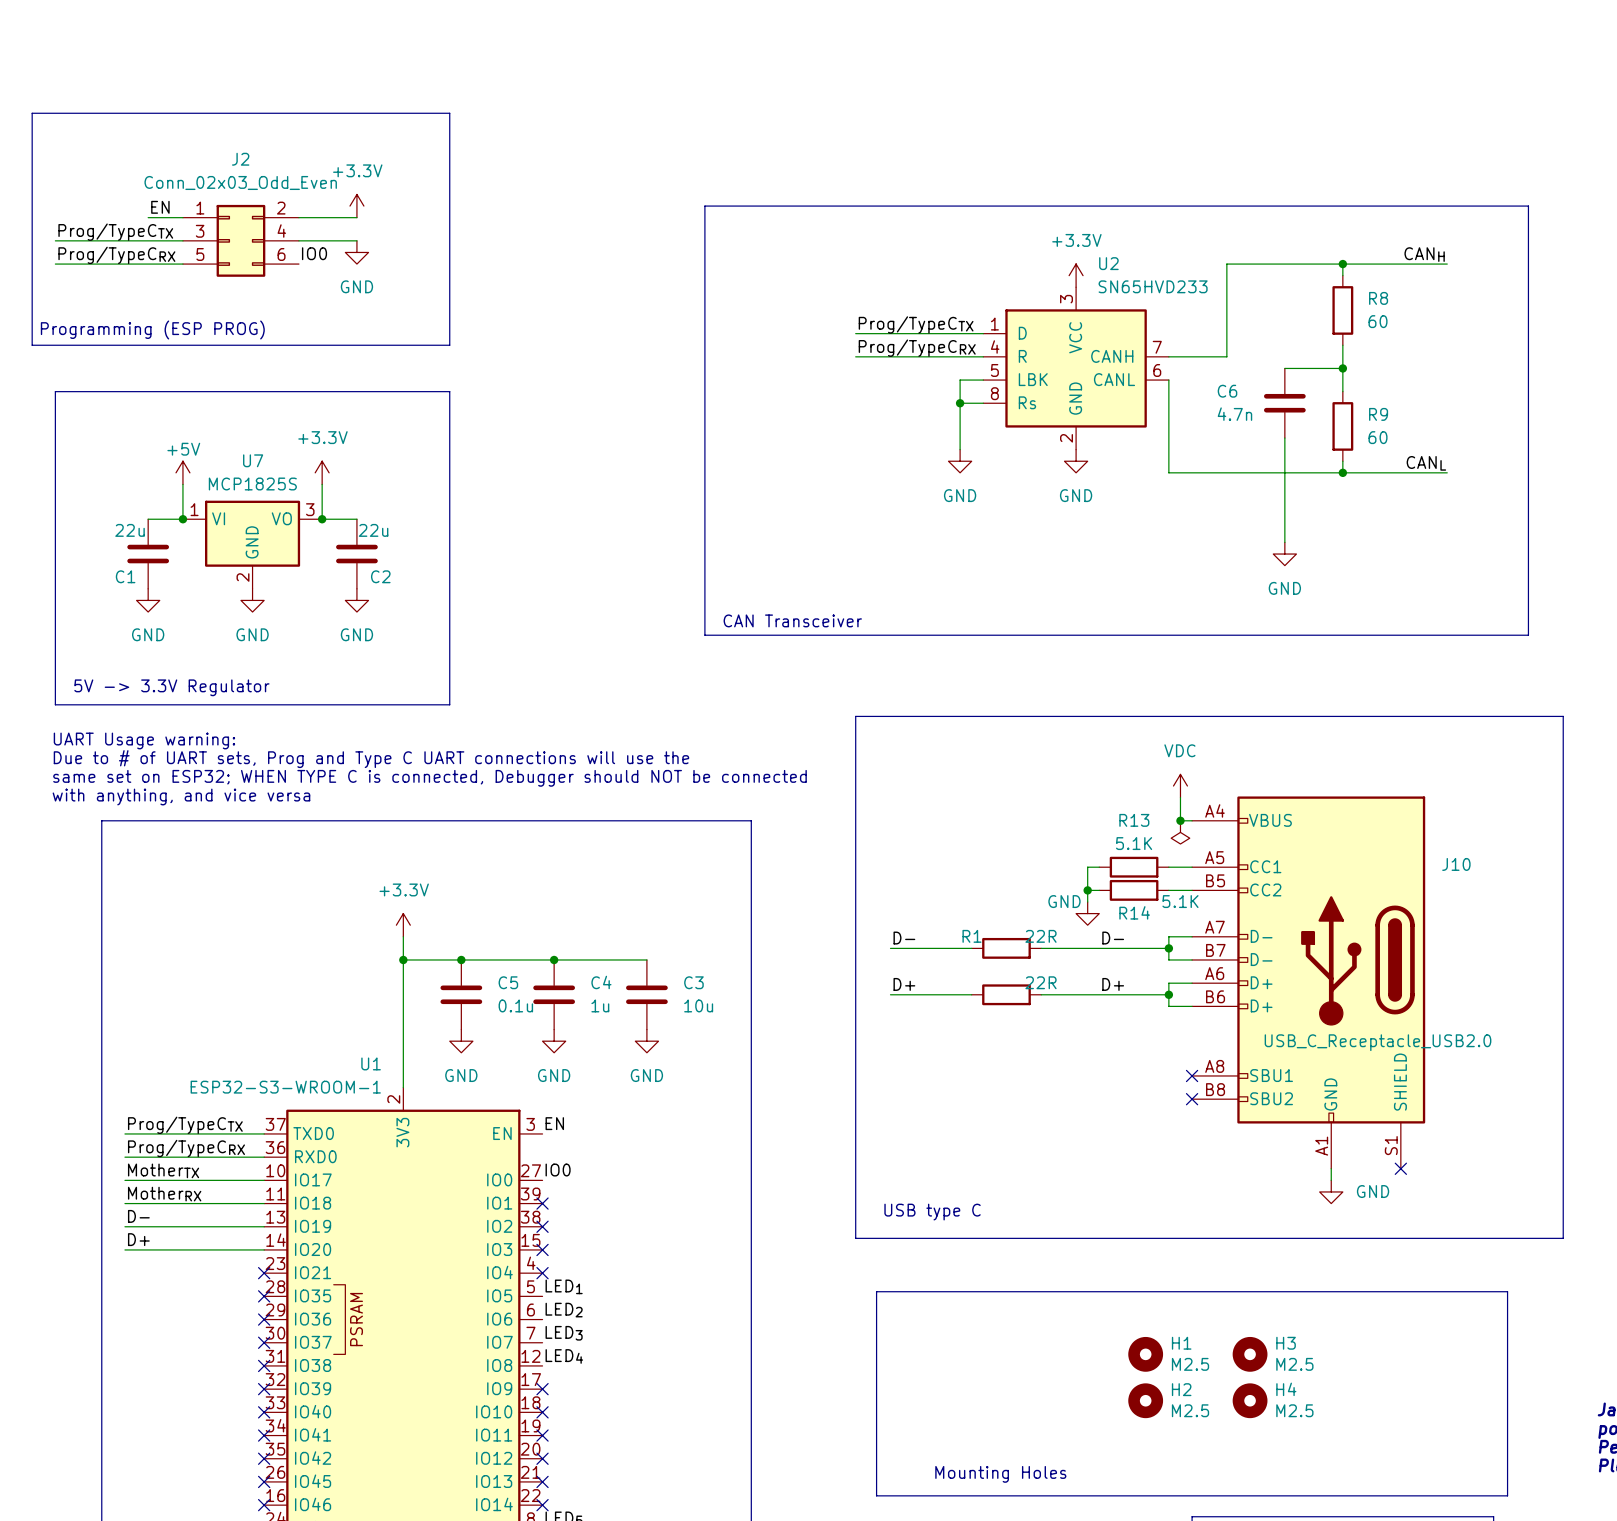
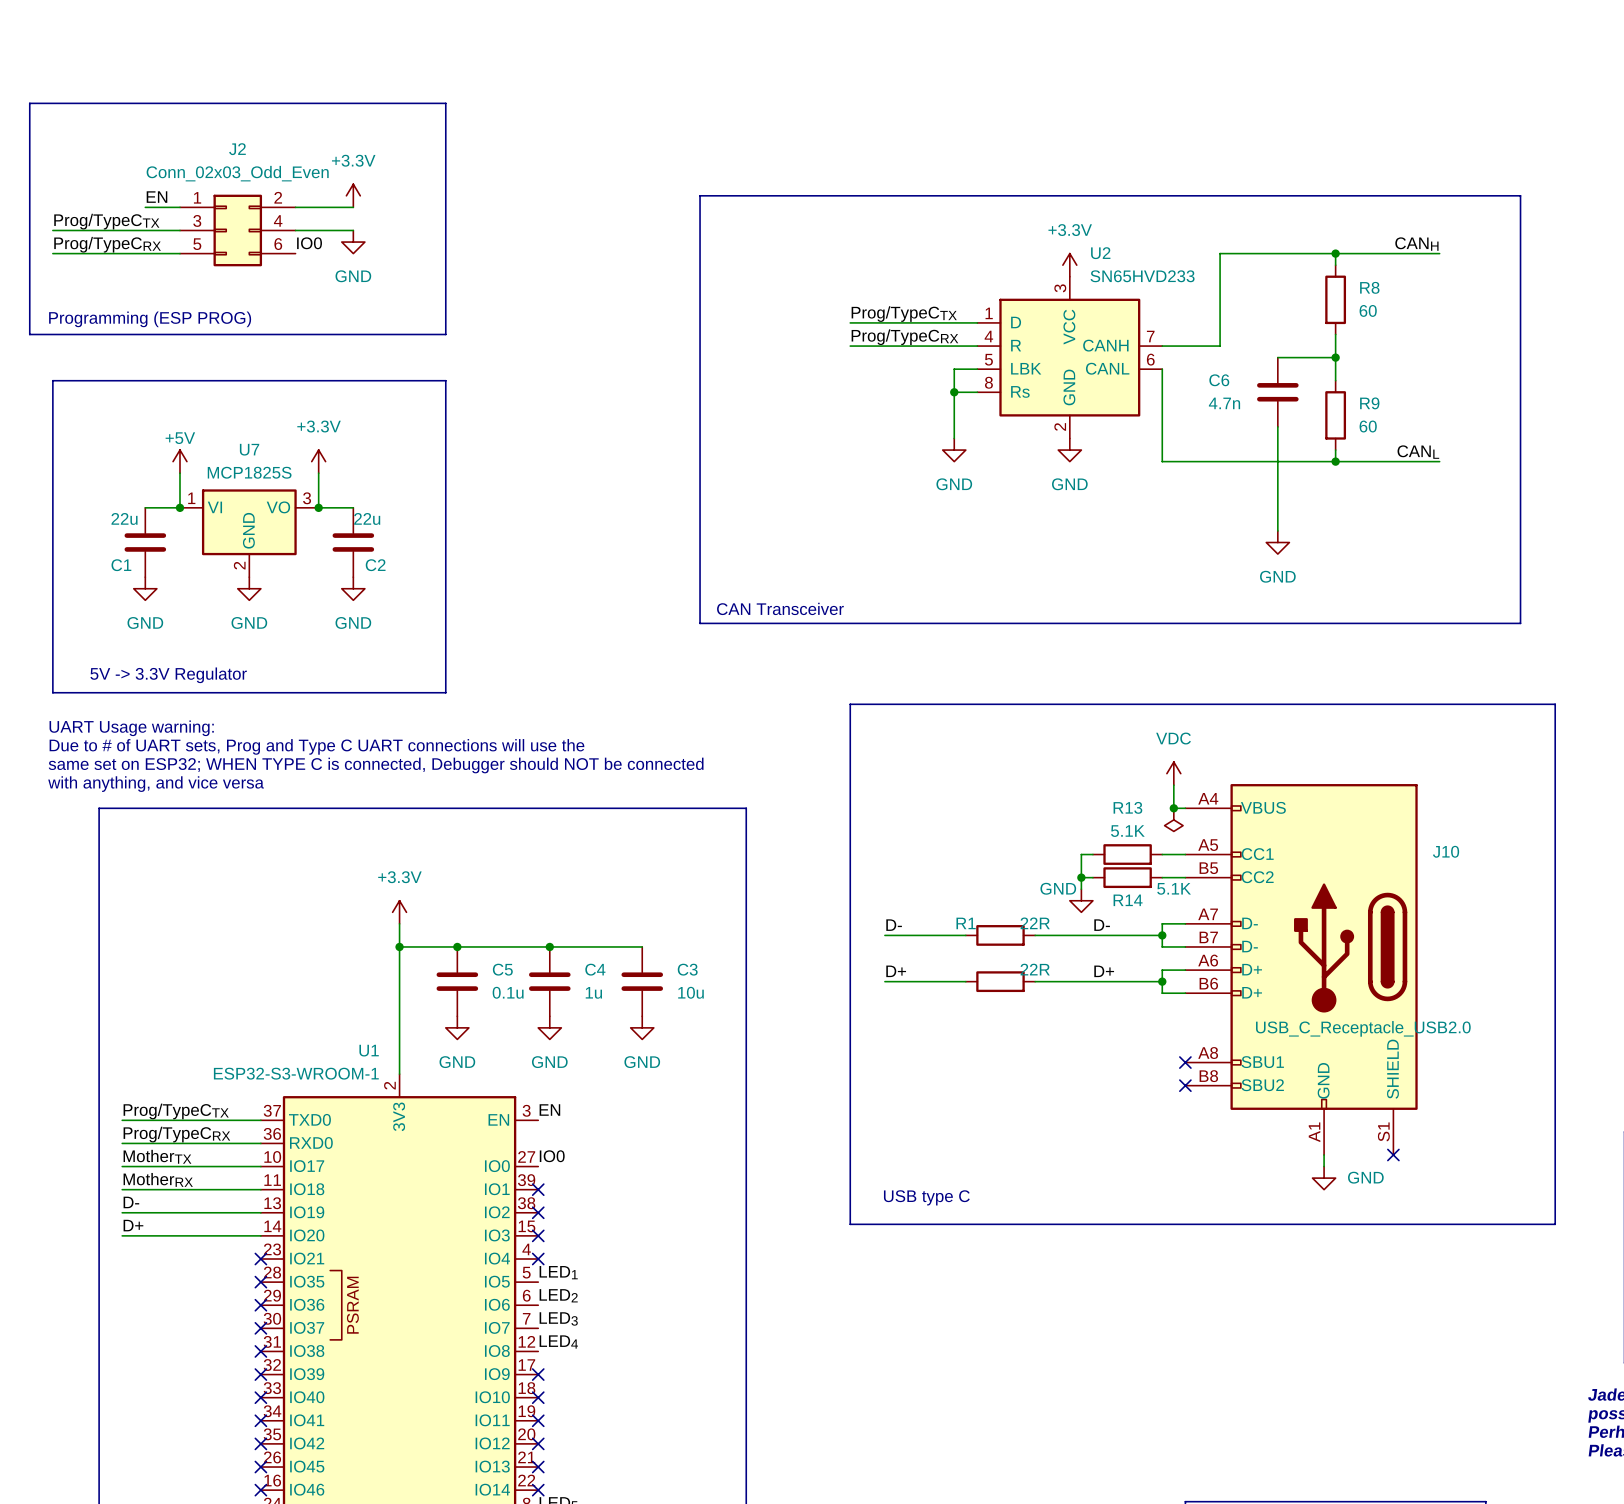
line: (876, 1291) (1507, 1291) (1507, 1495) (876, 1495) (876, 1291) -> none
H1: M2.5 (1145, 1354) -> none
H3: M2.5 (1250, 1354) -> none
H2: M2.5 (1145, 1400) -> none
H4: M2.5 (1250, 1400) -> none
text: Mounting Holes (1000, 1474) -> none

